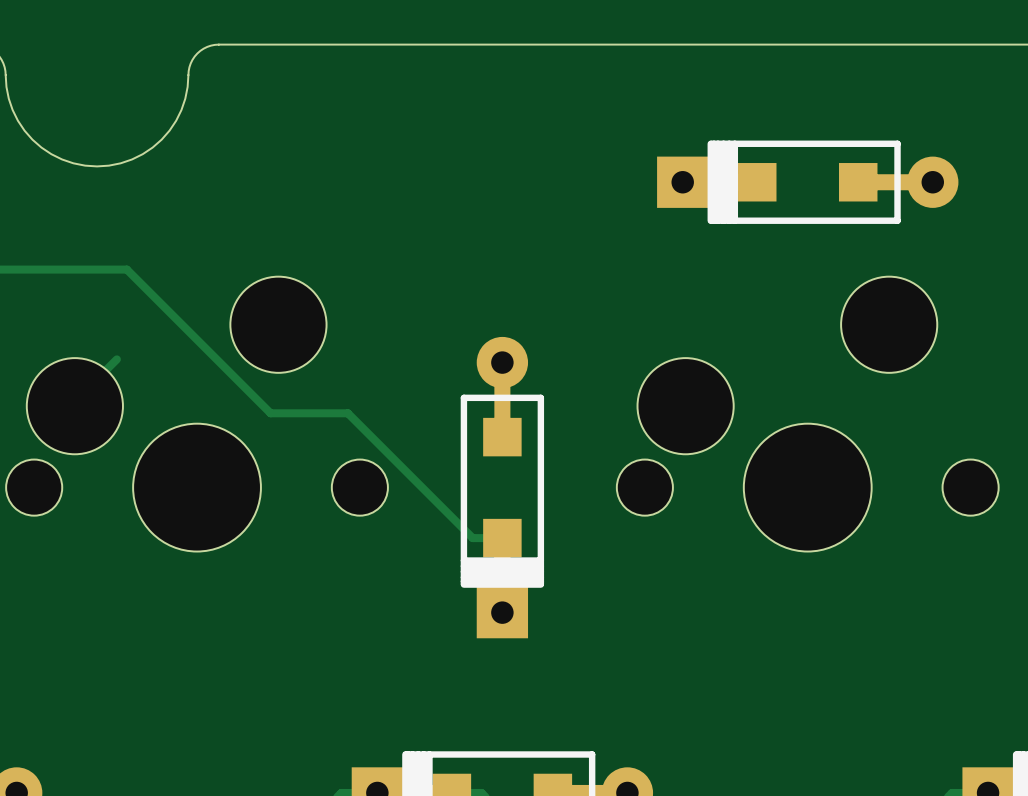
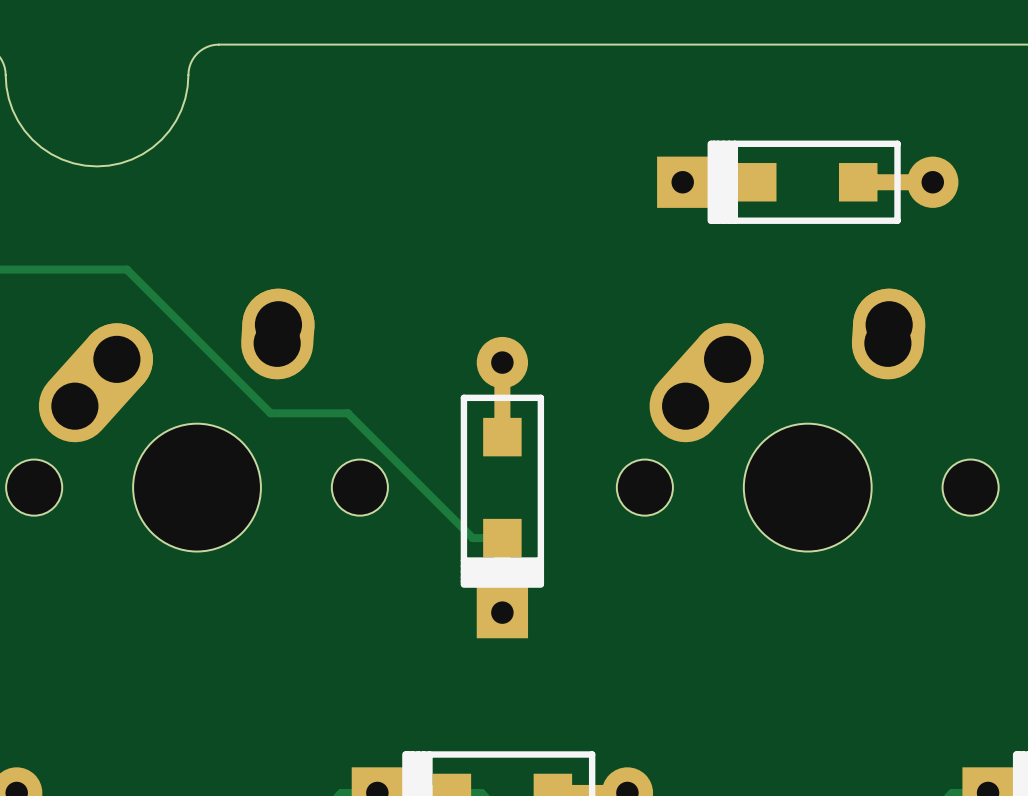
part footprint: [6, 276, 388, 552] -> [6, 288, 388, 552]
part footprint: [616, 276, 999, 552] -> [616, 288, 999, 552]

